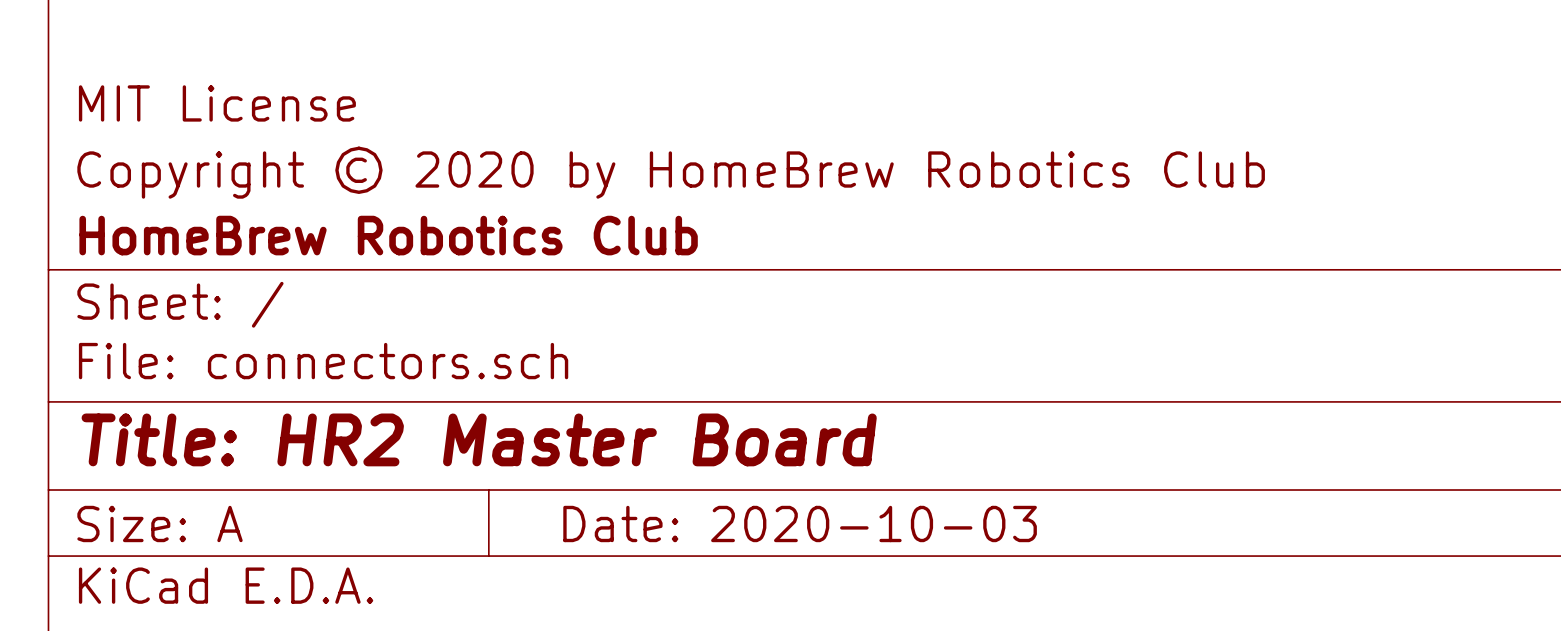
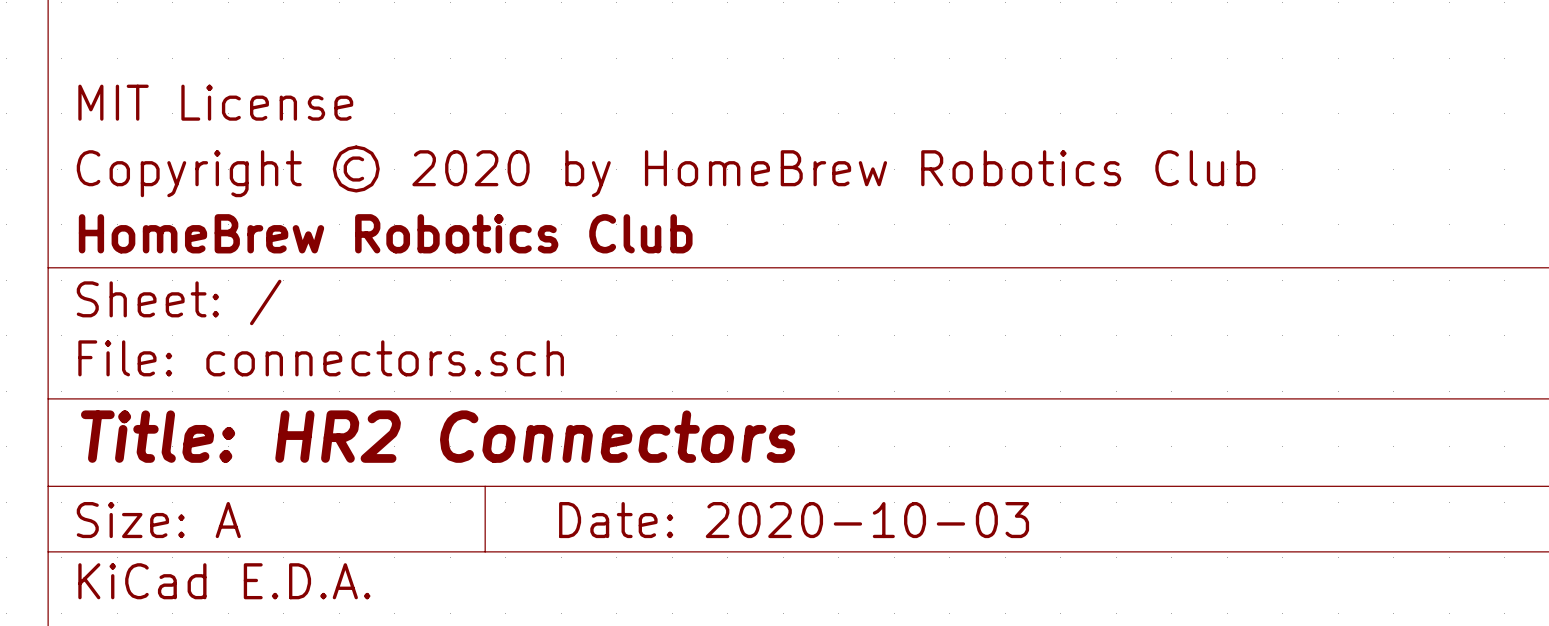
title block: Title: HR2 Master Board (479, 439) -> Title: HR2 Connectors (438, 436)

